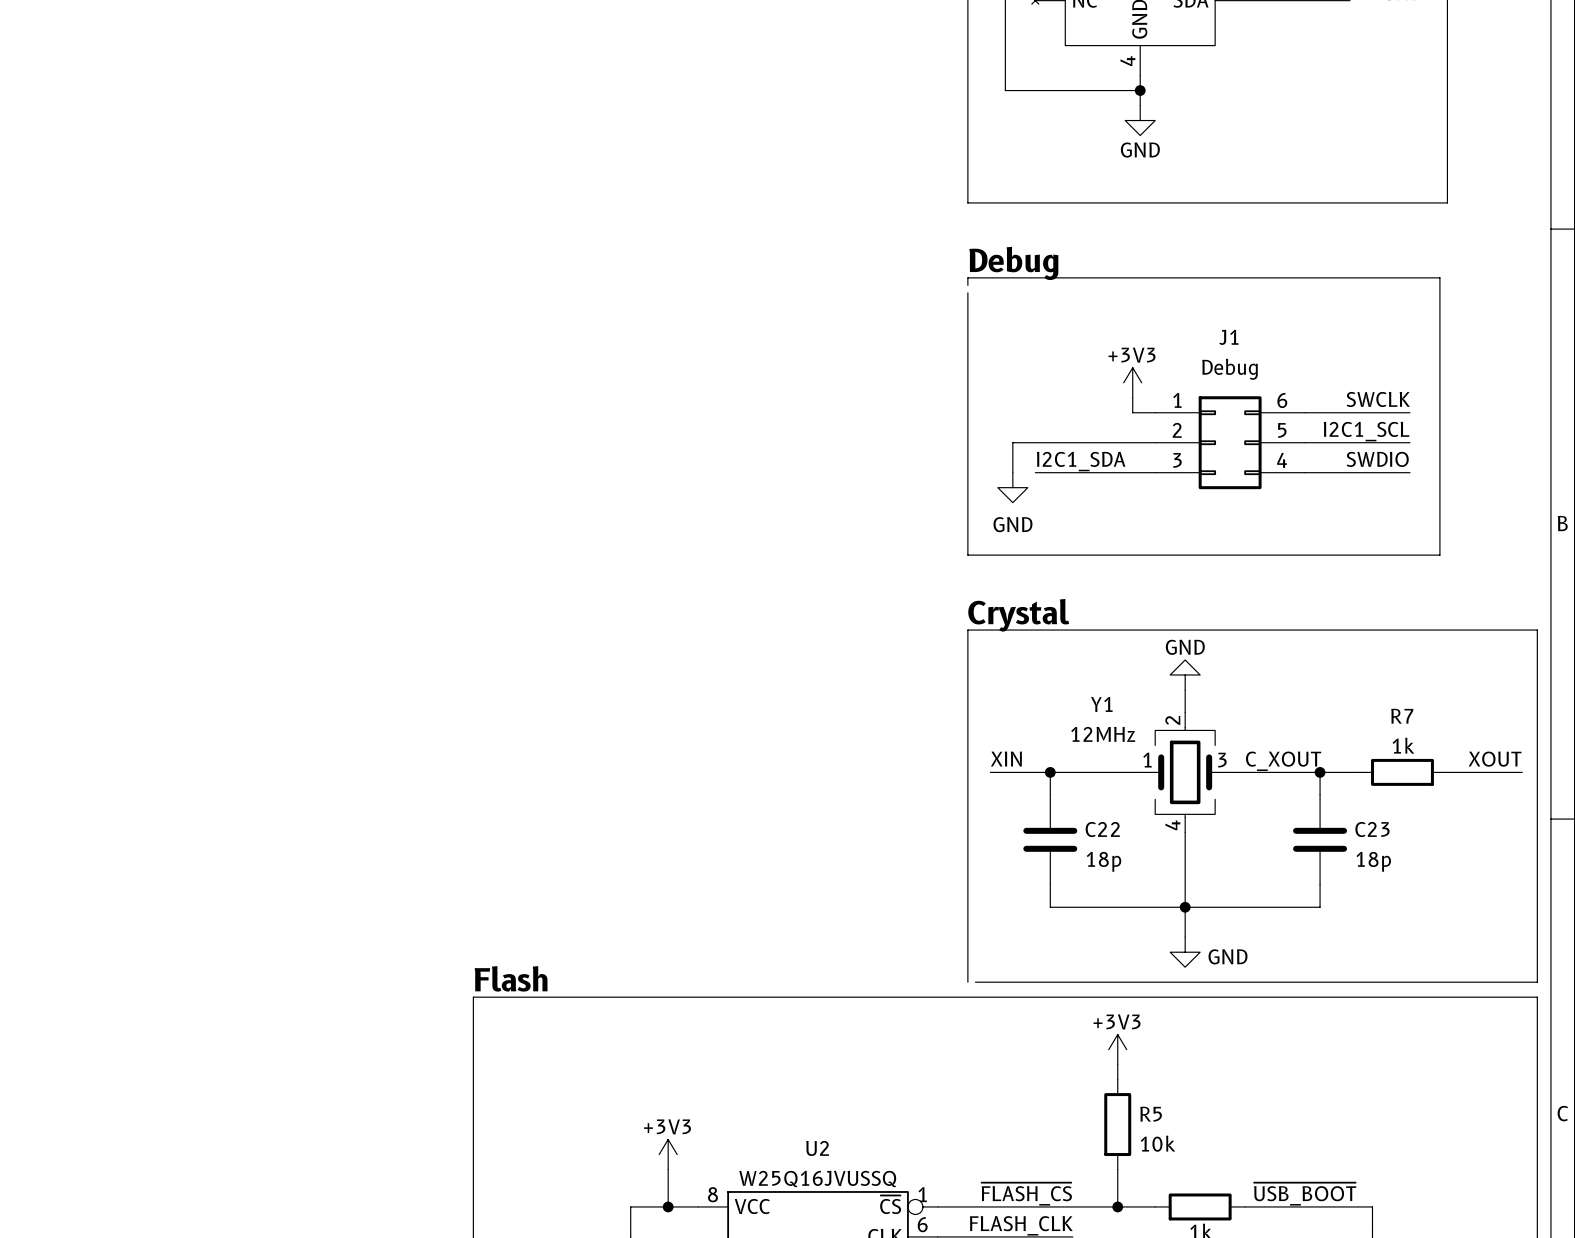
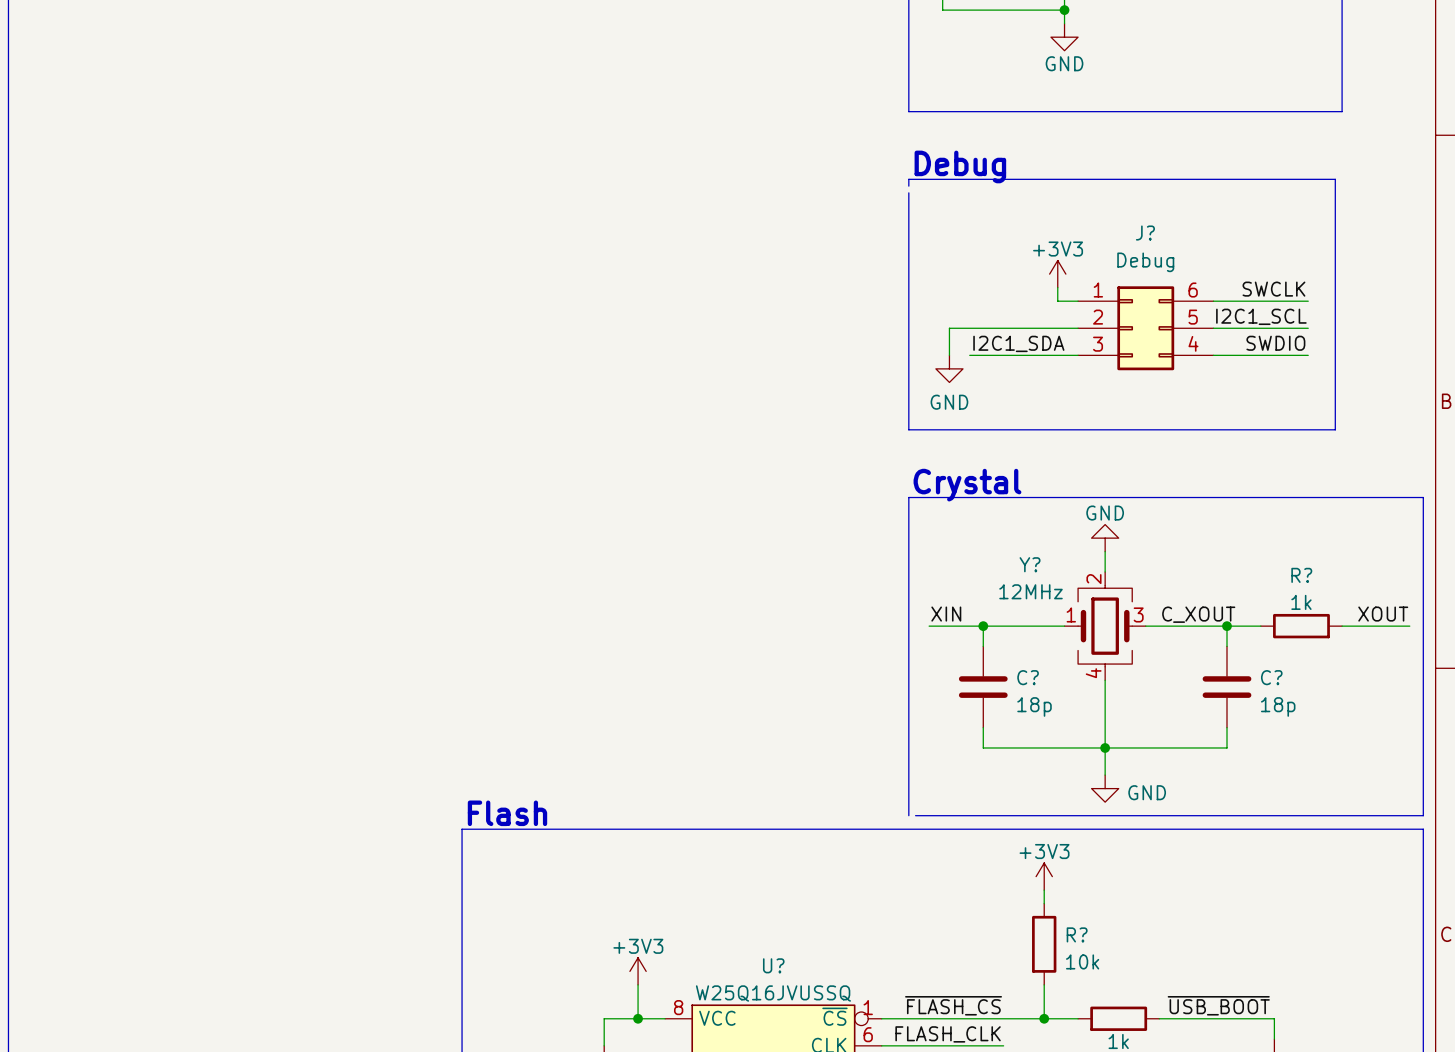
J1 name: J1 (1228, 337) -> J? (1145, 233)
Y1 name: Y1 (1101, 704) -> Y? (1030, 564)
R7 name: R7 (1402, 716) -> R? (1301, 575)
C22 name: C22 (1102, 829) -> C? (1028, 677)
C23 name: C23 (1372, 829) -> C? (1271, 677)
R5 name: R5 (1151, 1114) -> R? (1077, 934)
U2 name: U2 (817, 1148) -> U? (773, 965)

